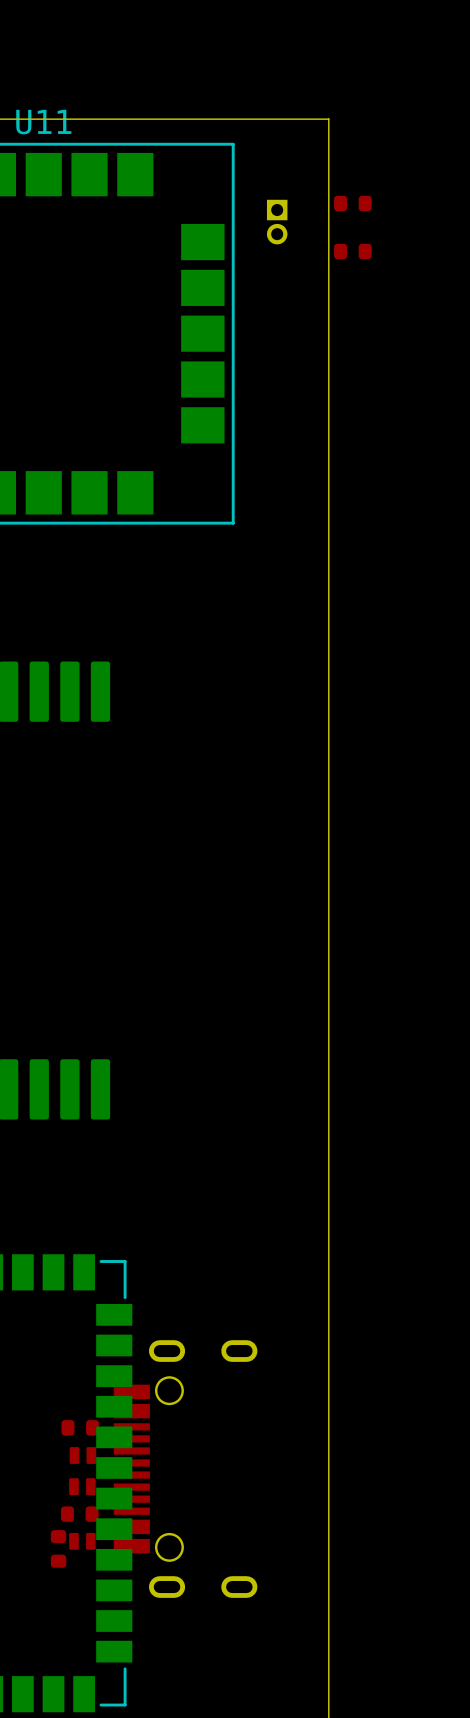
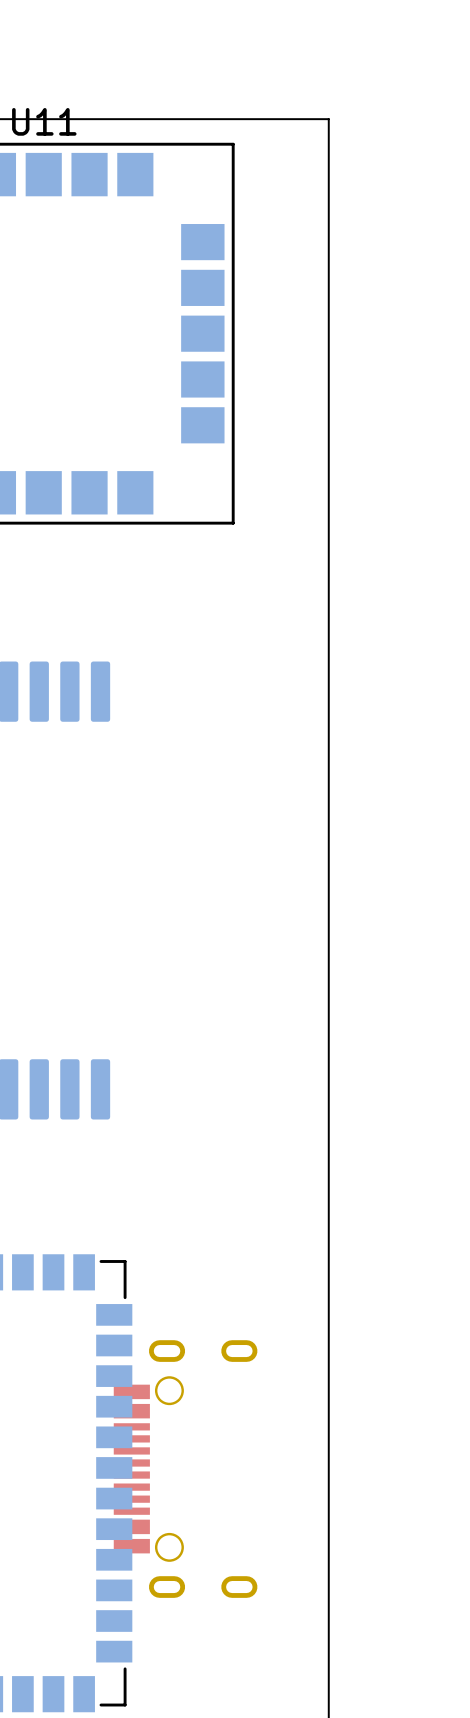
part: (352, 203) -> none
part: (277, 222) -> none
part: (352, 251) -> none
part: (80, 1427) -> none
part: (82, 1455) -> none
part: (82, 1486) -> none
part: (79, 1514) -> none
part: (82, 1541) -> none
part: (58, 1548) -> none

